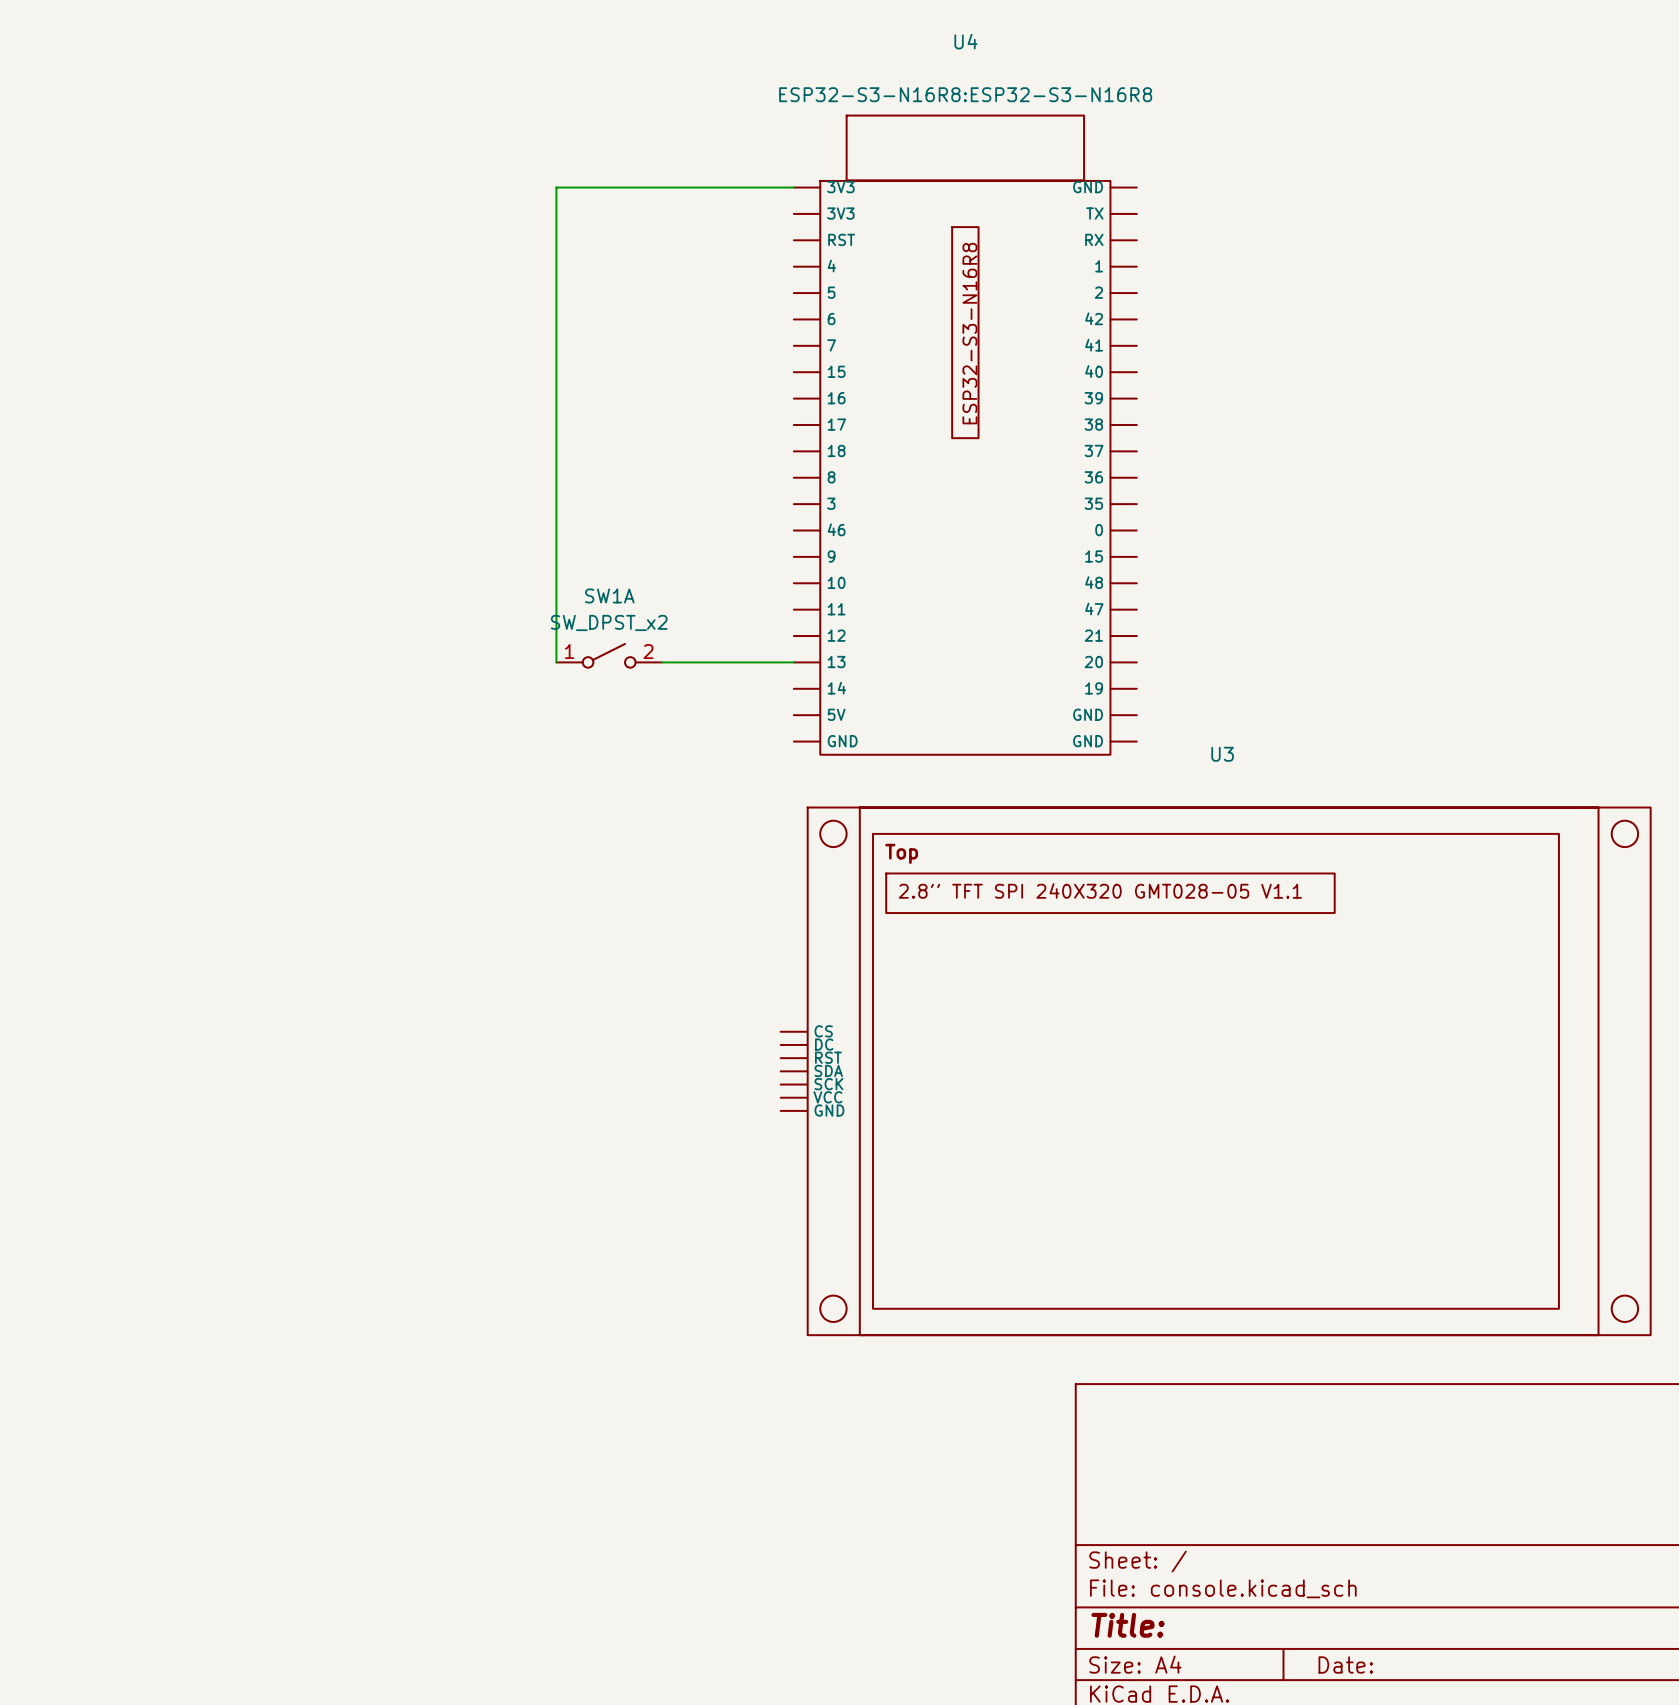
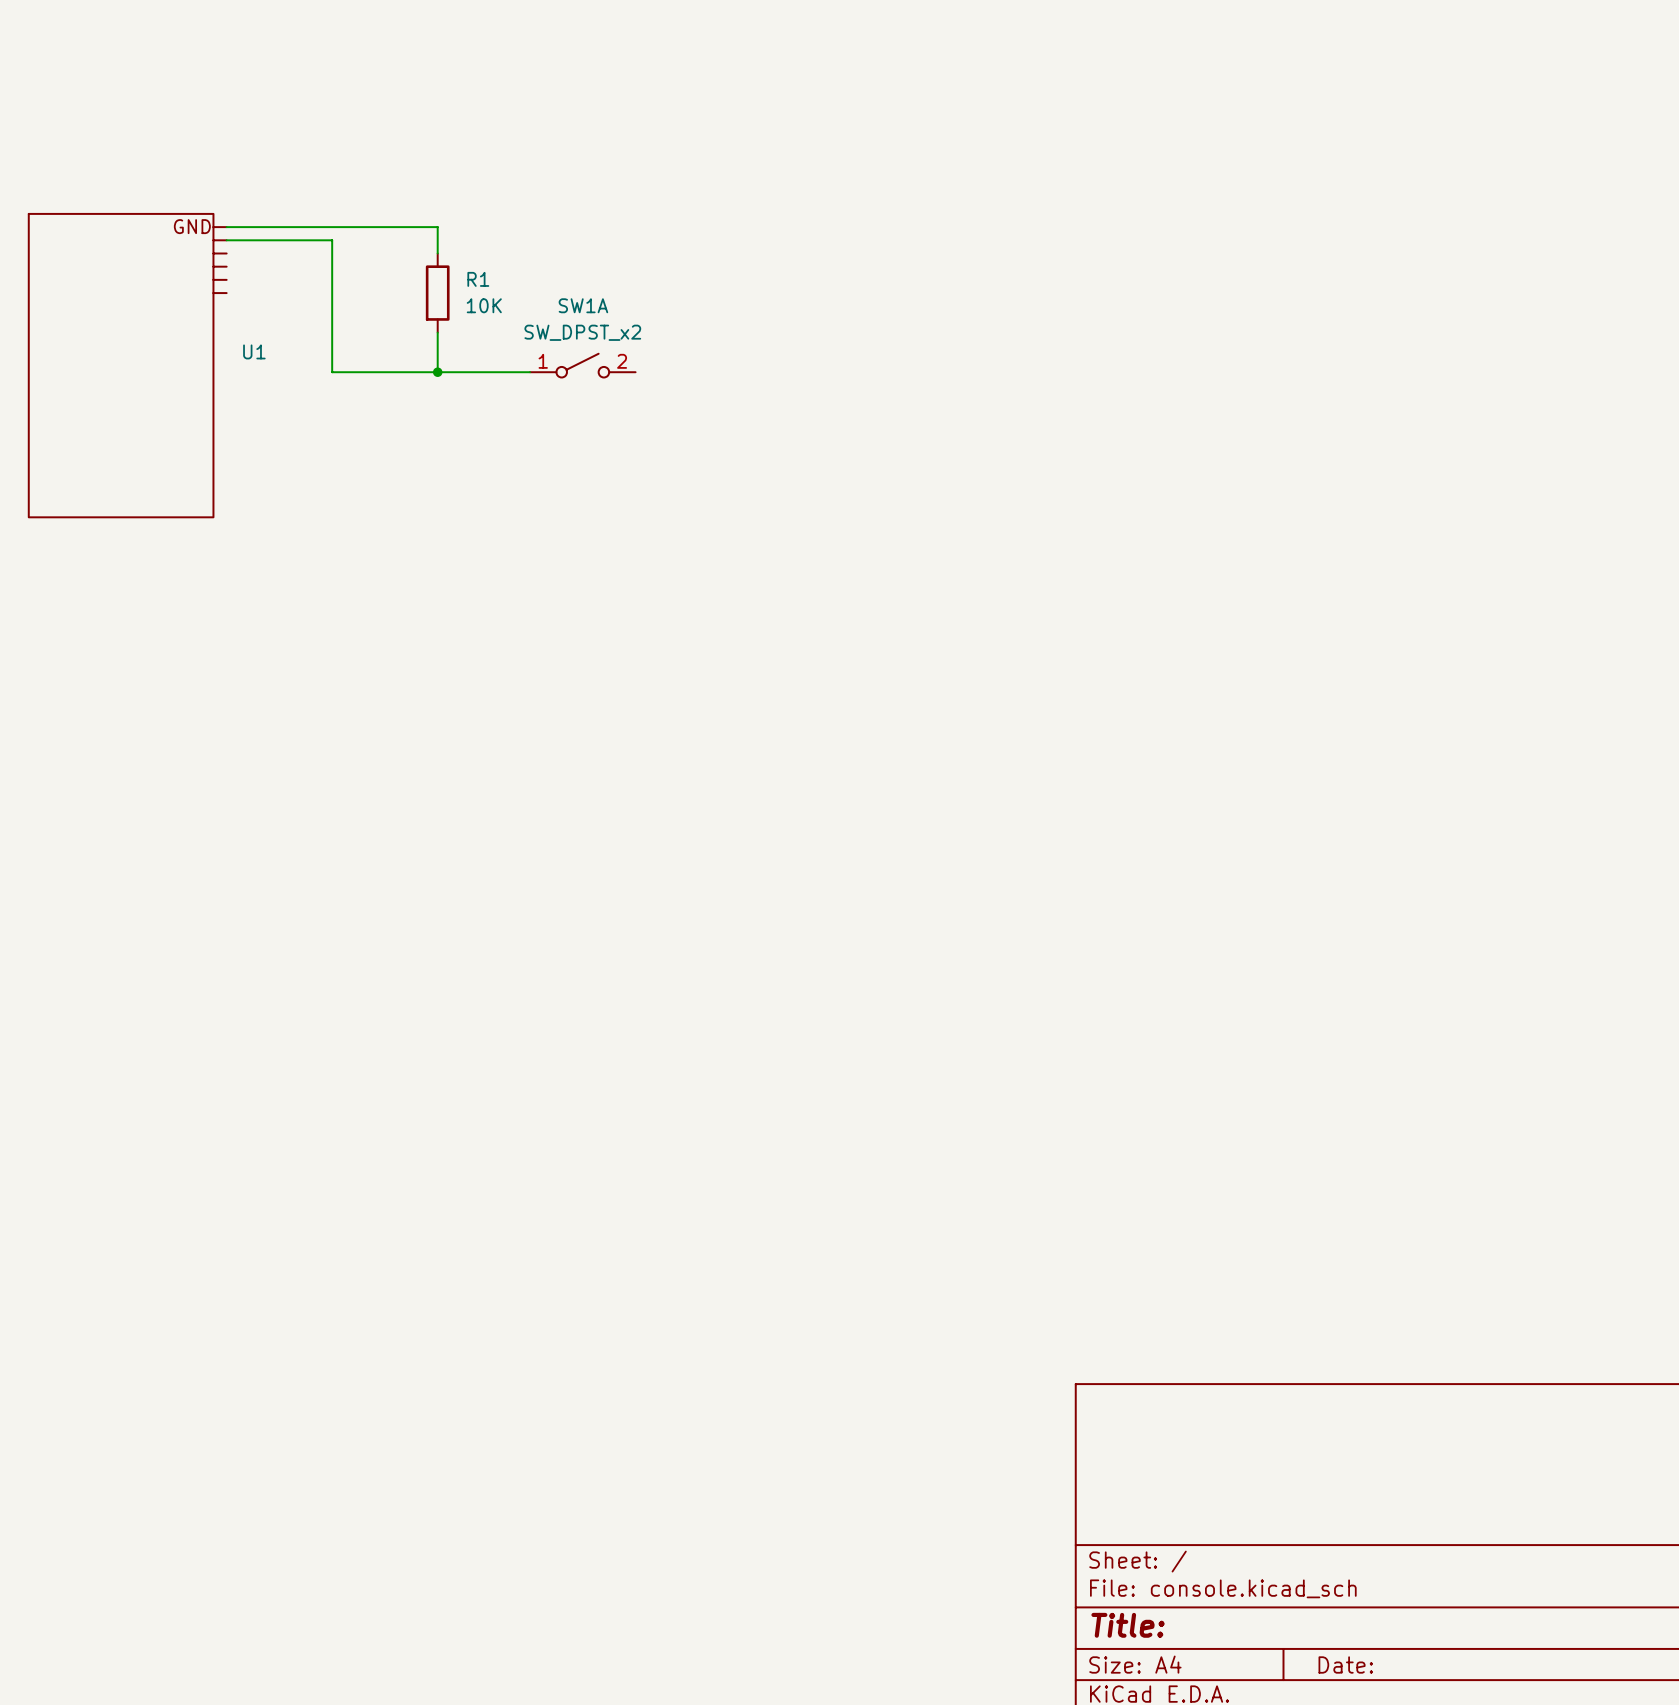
wire: (793, 187) (556, 187) (556, 662) -> none
wire: none -> (226, 227) (437, 227) (437, 253)
wire: none -> (226, 240) (332, 240) (332, 372) (530, 372)
R1: none -> 10K (437, 293)
wire: none -> (437, 332) (437, 372)
U1: none -> (127, 365)
junction: none -> (437, 372)
U4: (965, 435) -> none
SW1A position: (609, 655) -> (582, 365)
wire: (661, 662) (793, 662) -> none
U3: (1215, 1071) -> none

